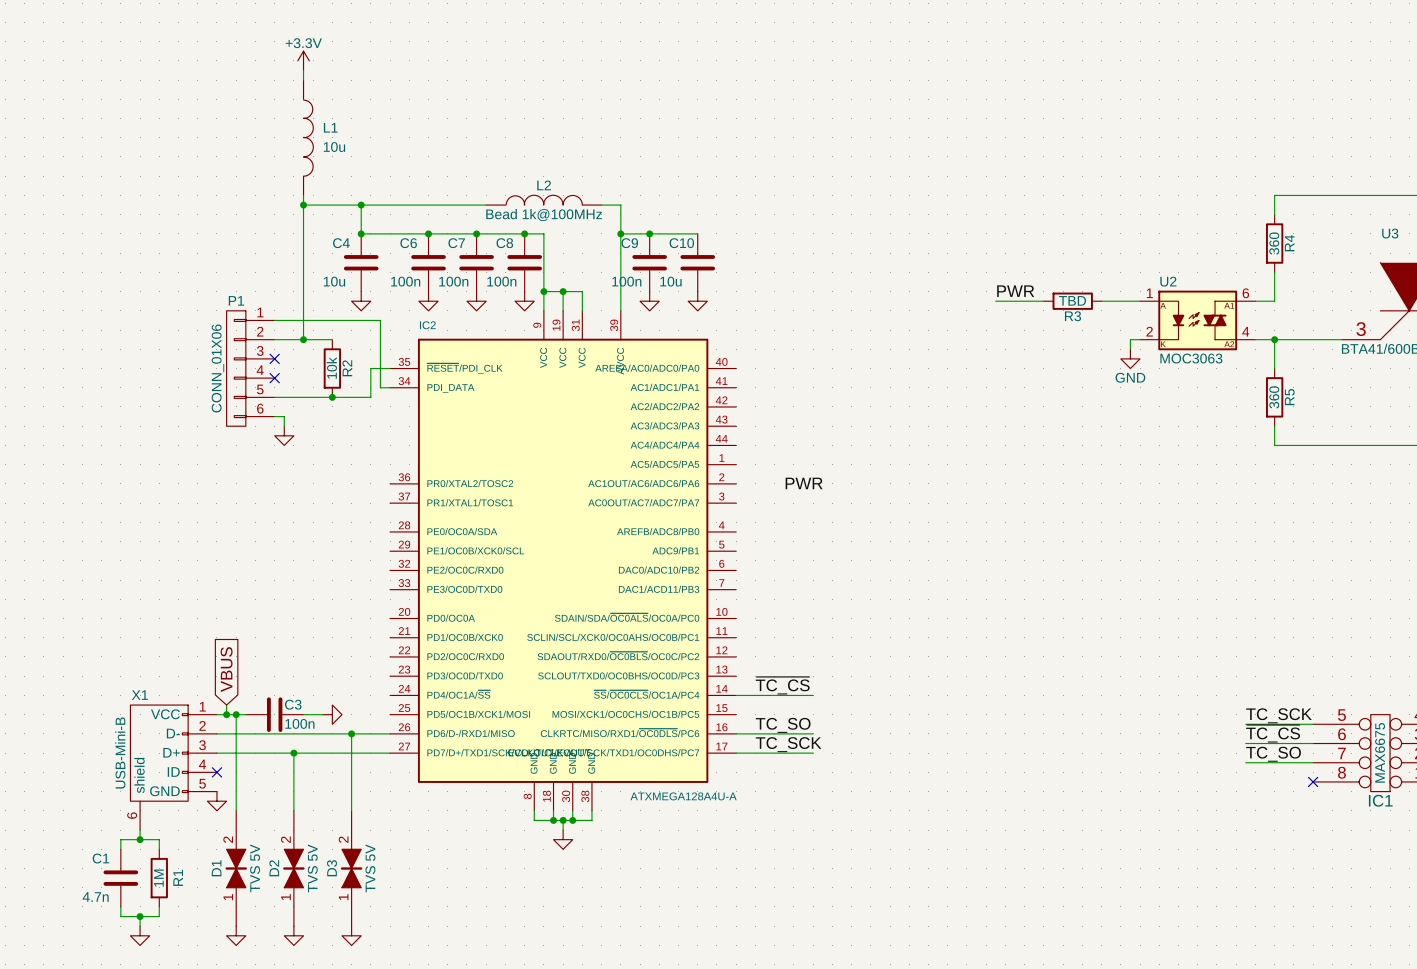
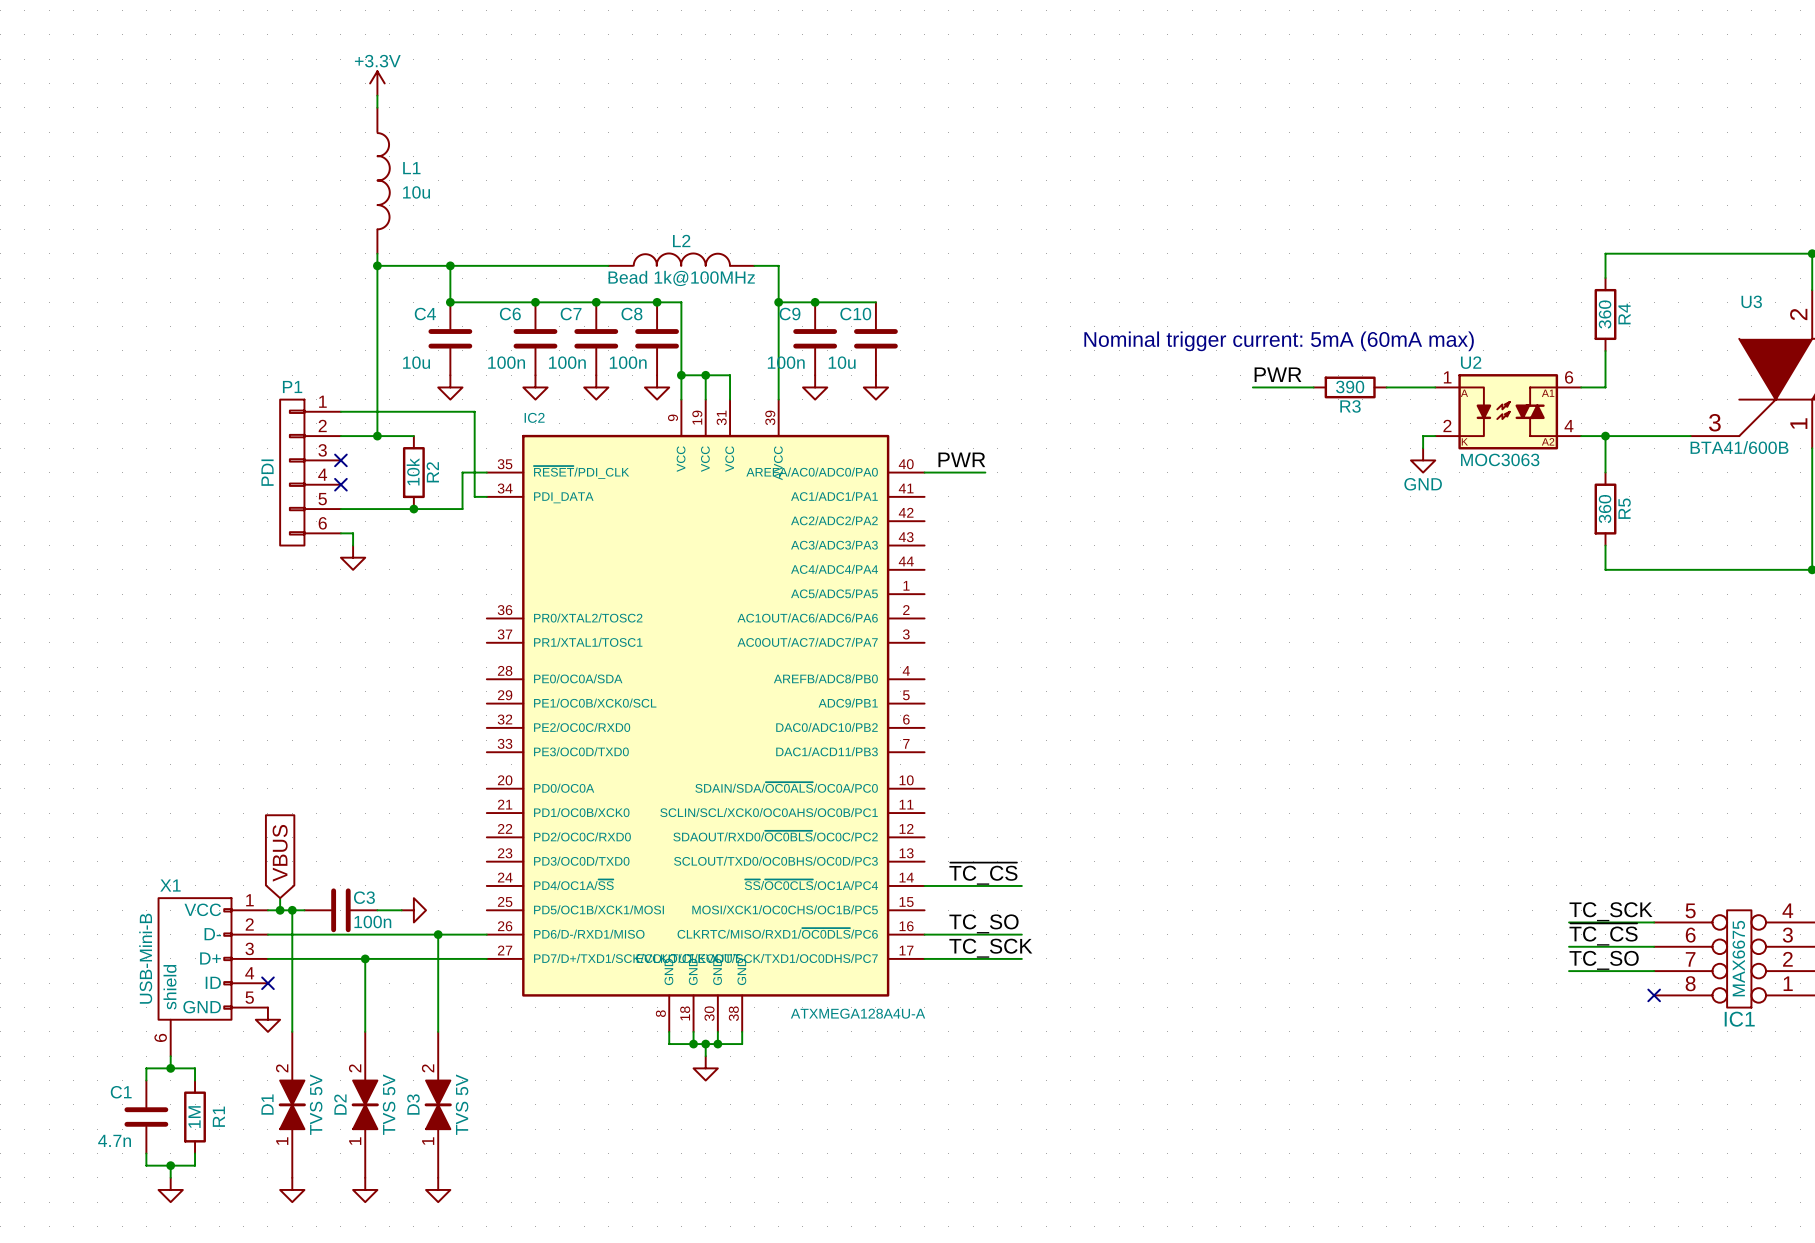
text: none -> Nominal trigger current: 5mA (60mA max) (1279, 341)
R3 value: TBD (1072, 300) -> 390 (1350, 386)
P1 value: CONN_01X06 (217, 368) -> PDI (267, 472)
wire: none -> (924, 472) (985, 472)
label position: PWR (804, 483) -> PWR (961, 459)

